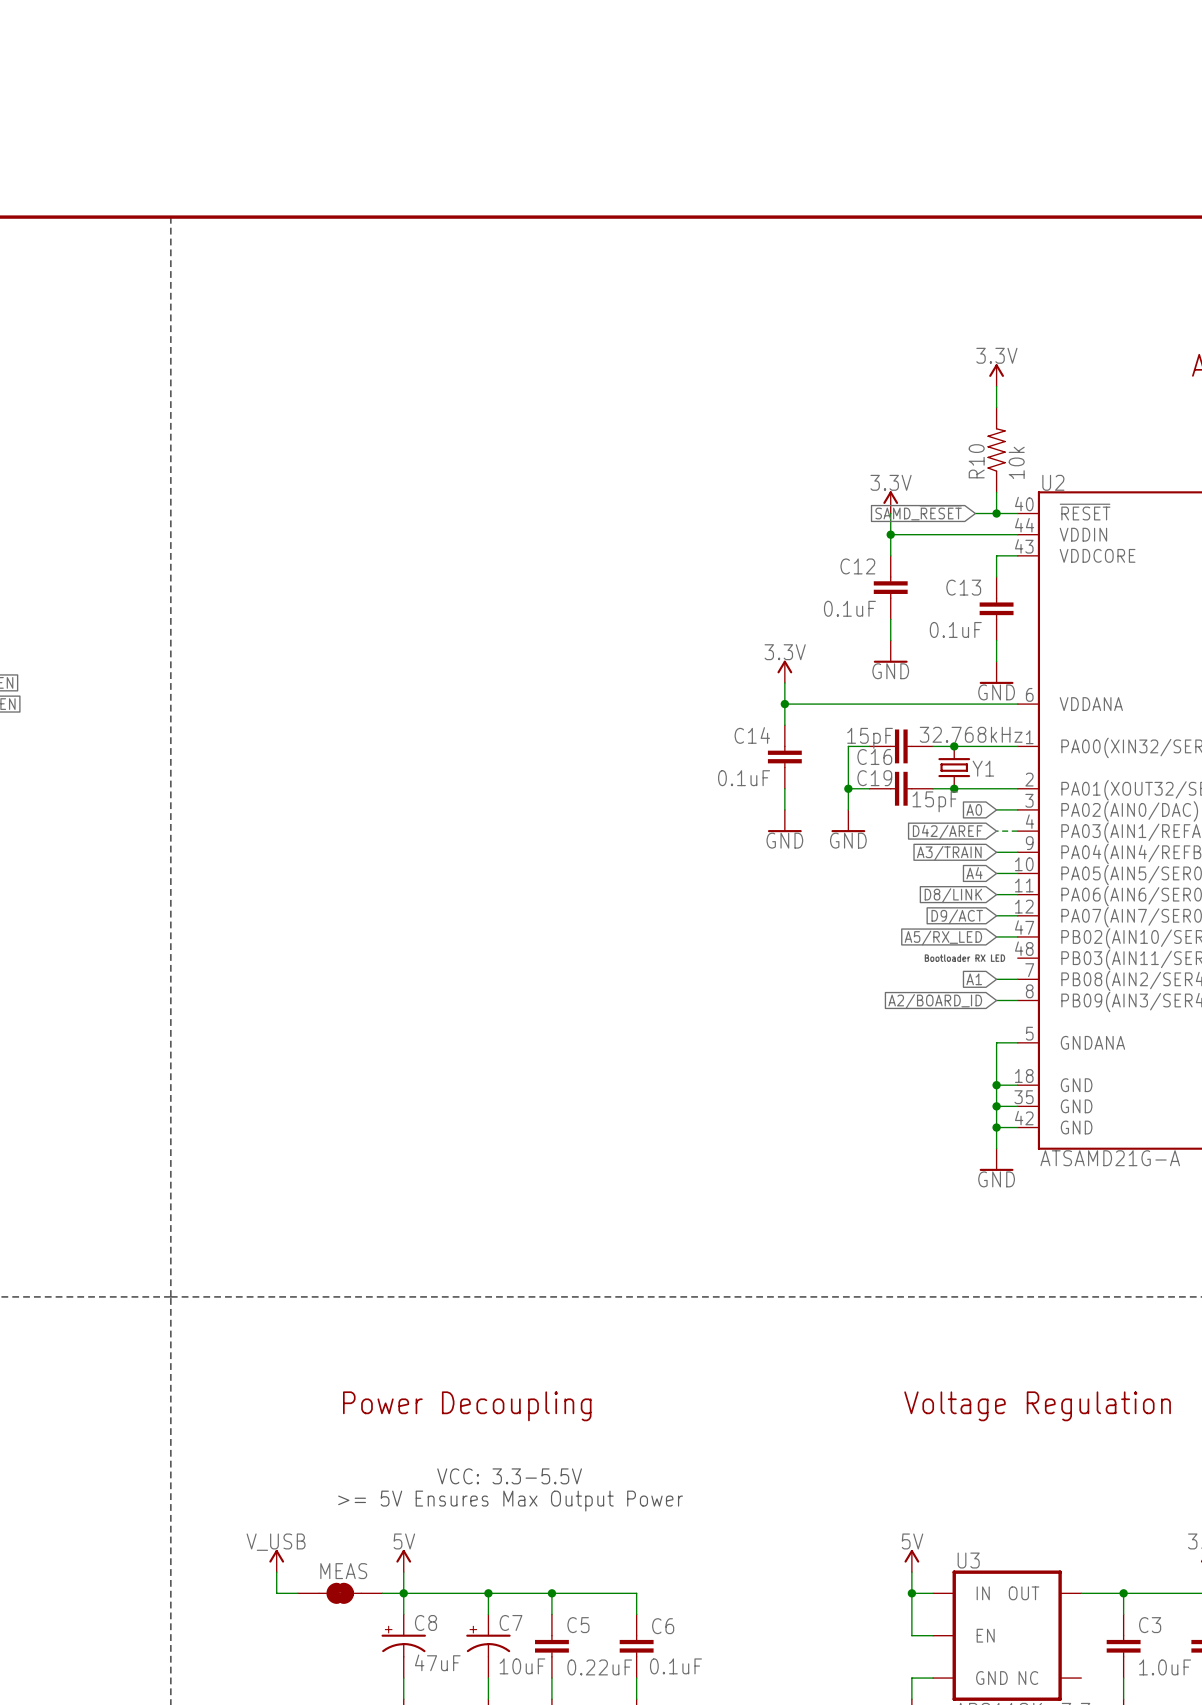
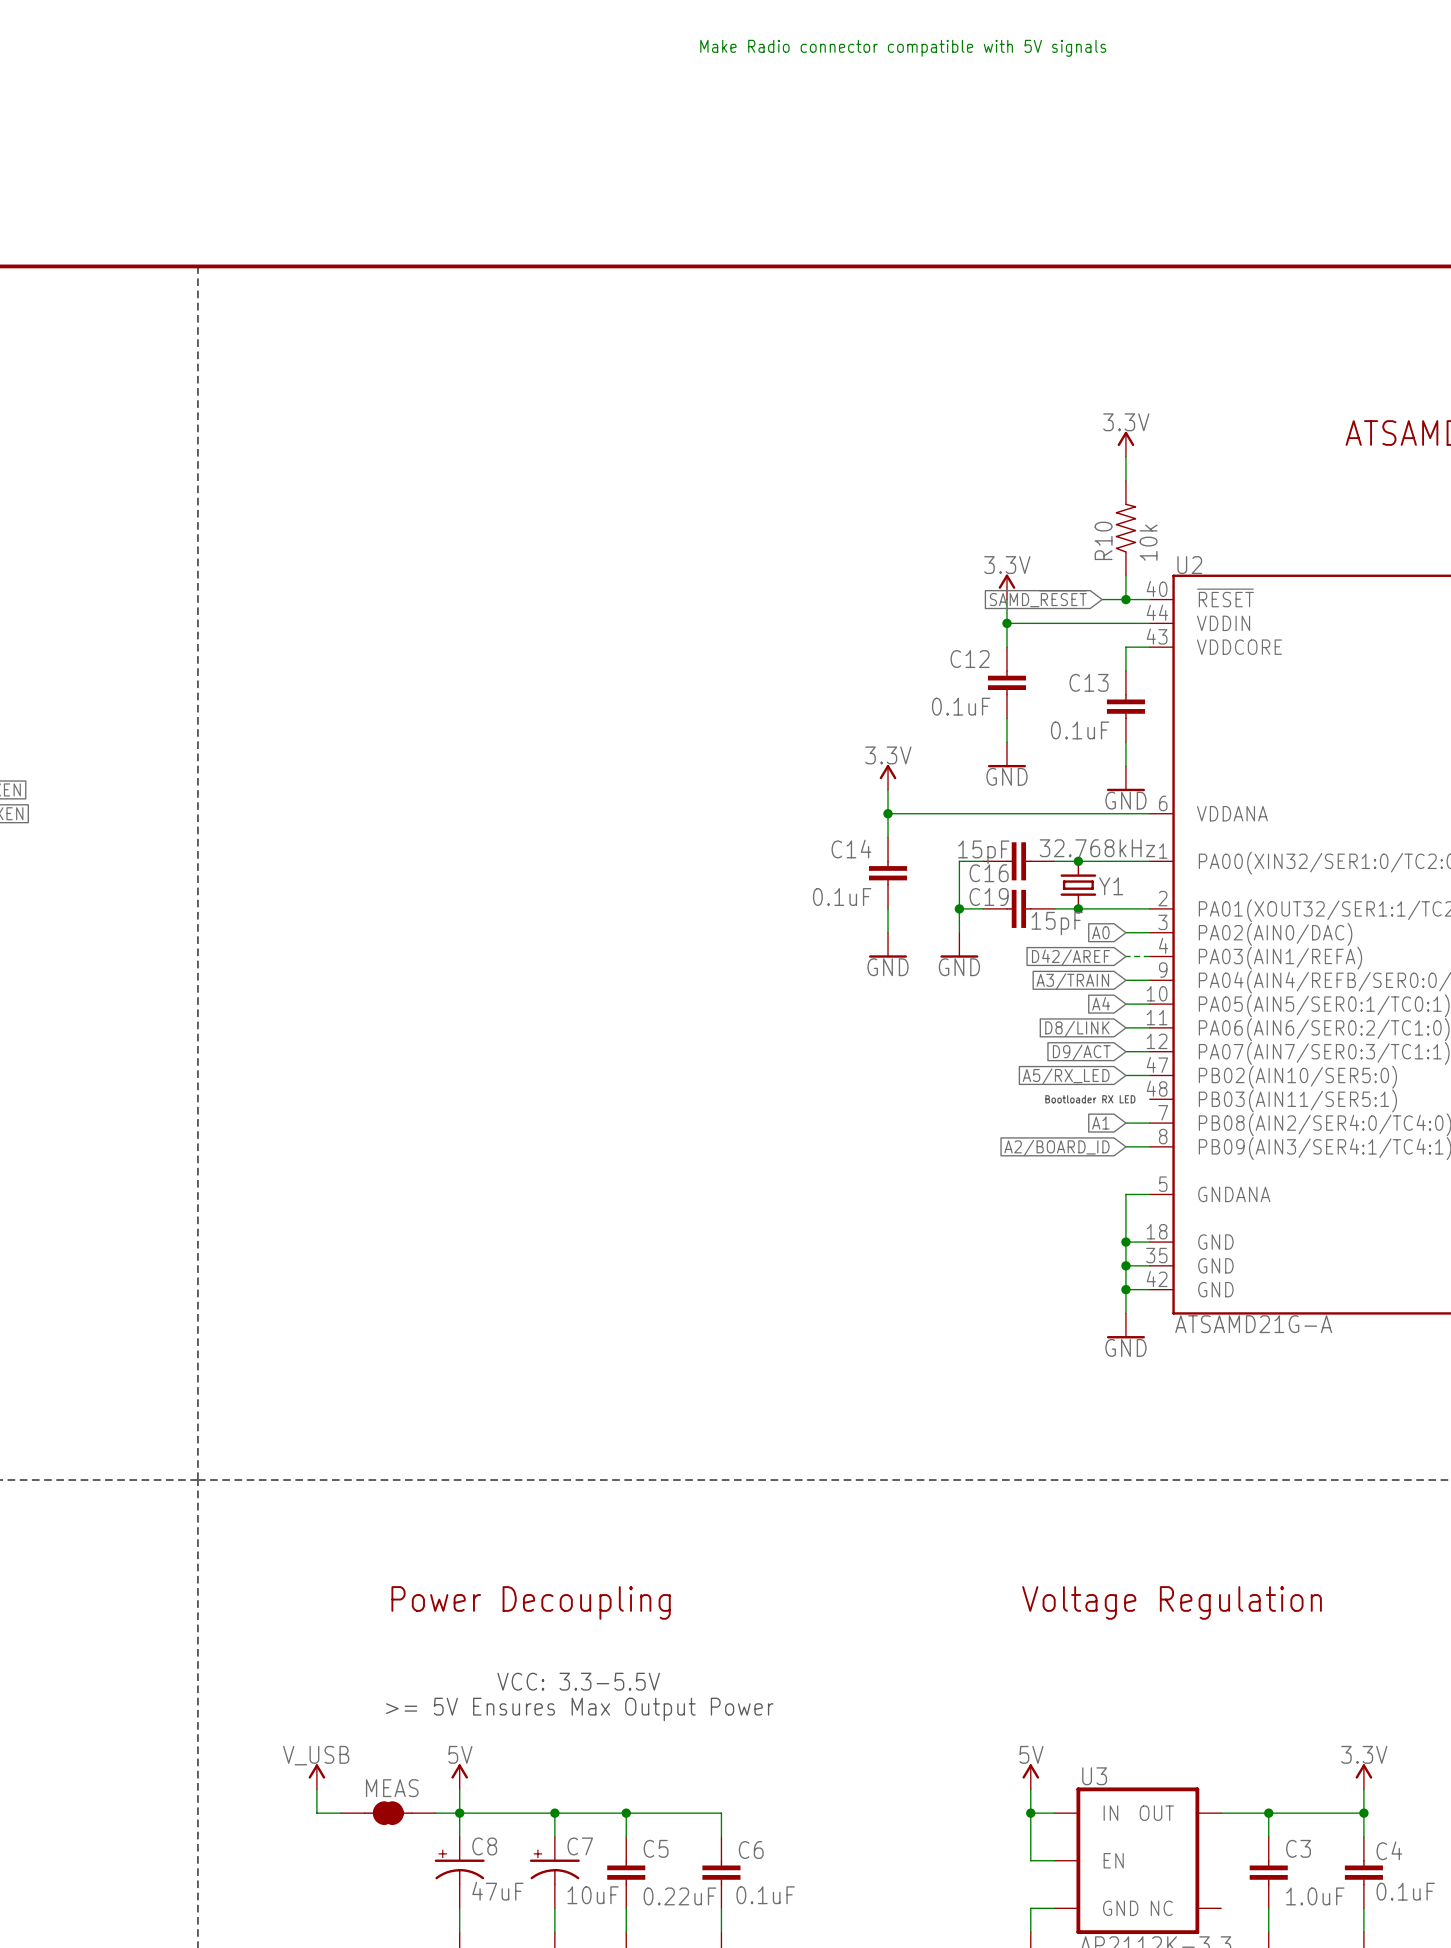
text: none -> Make Radio connector compatible with 5V signals (903, 48)

